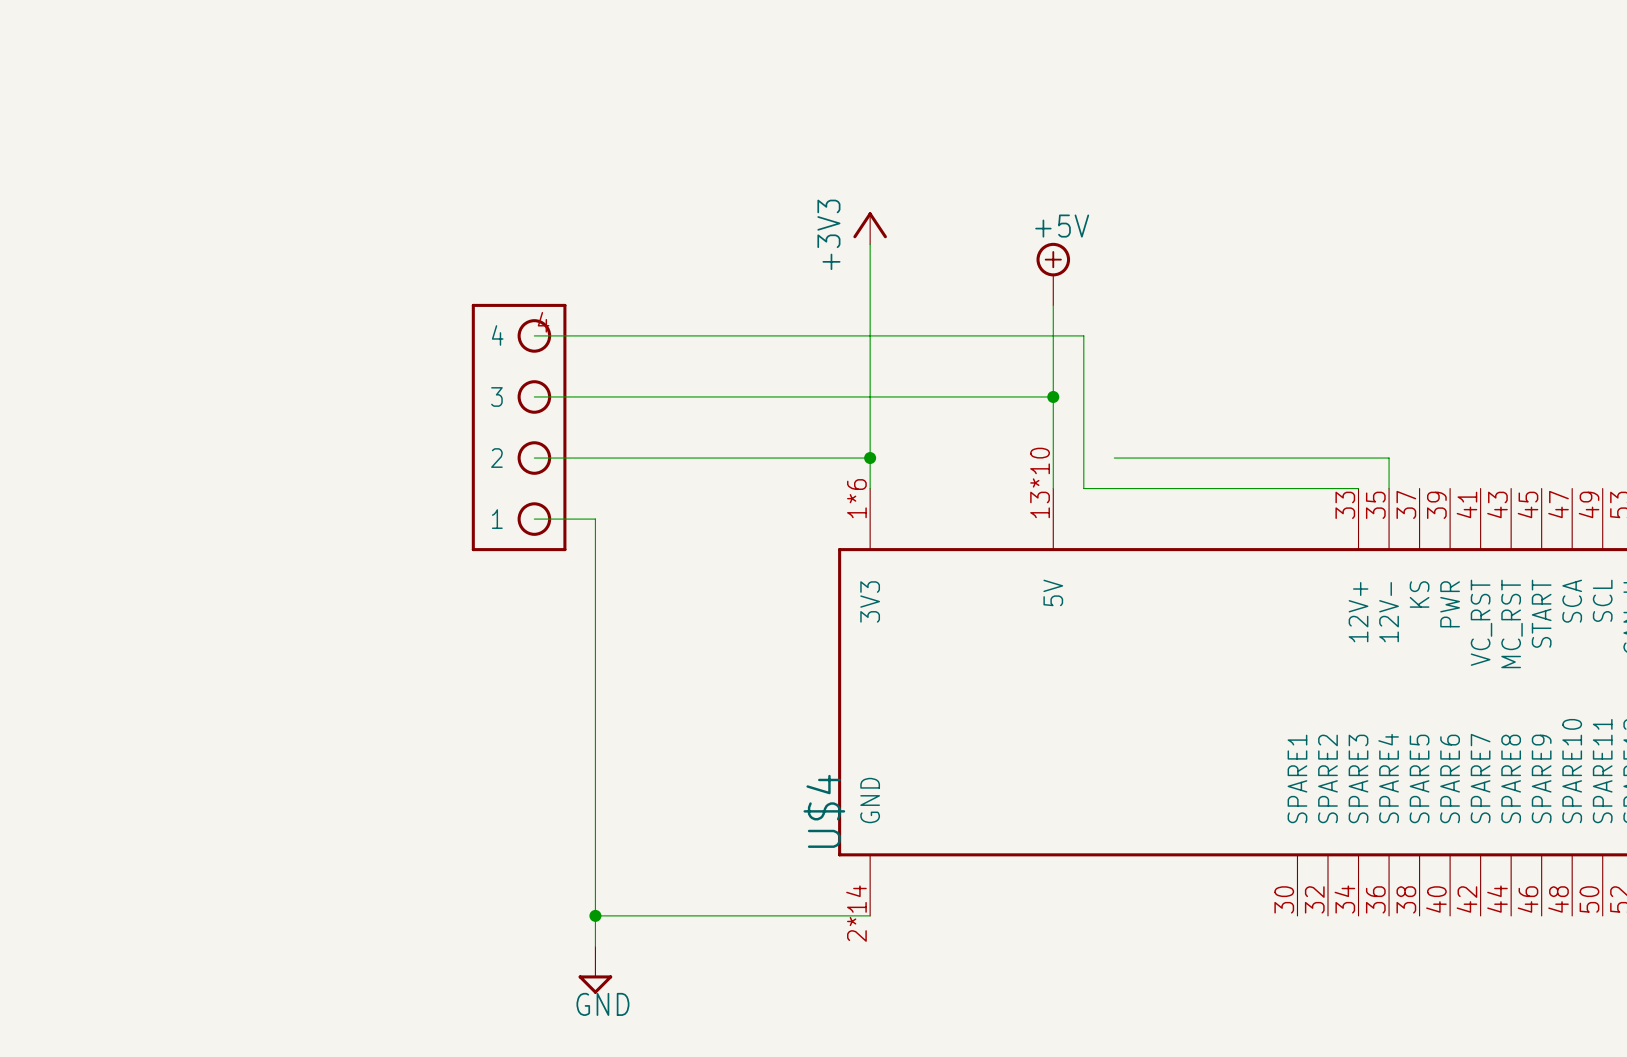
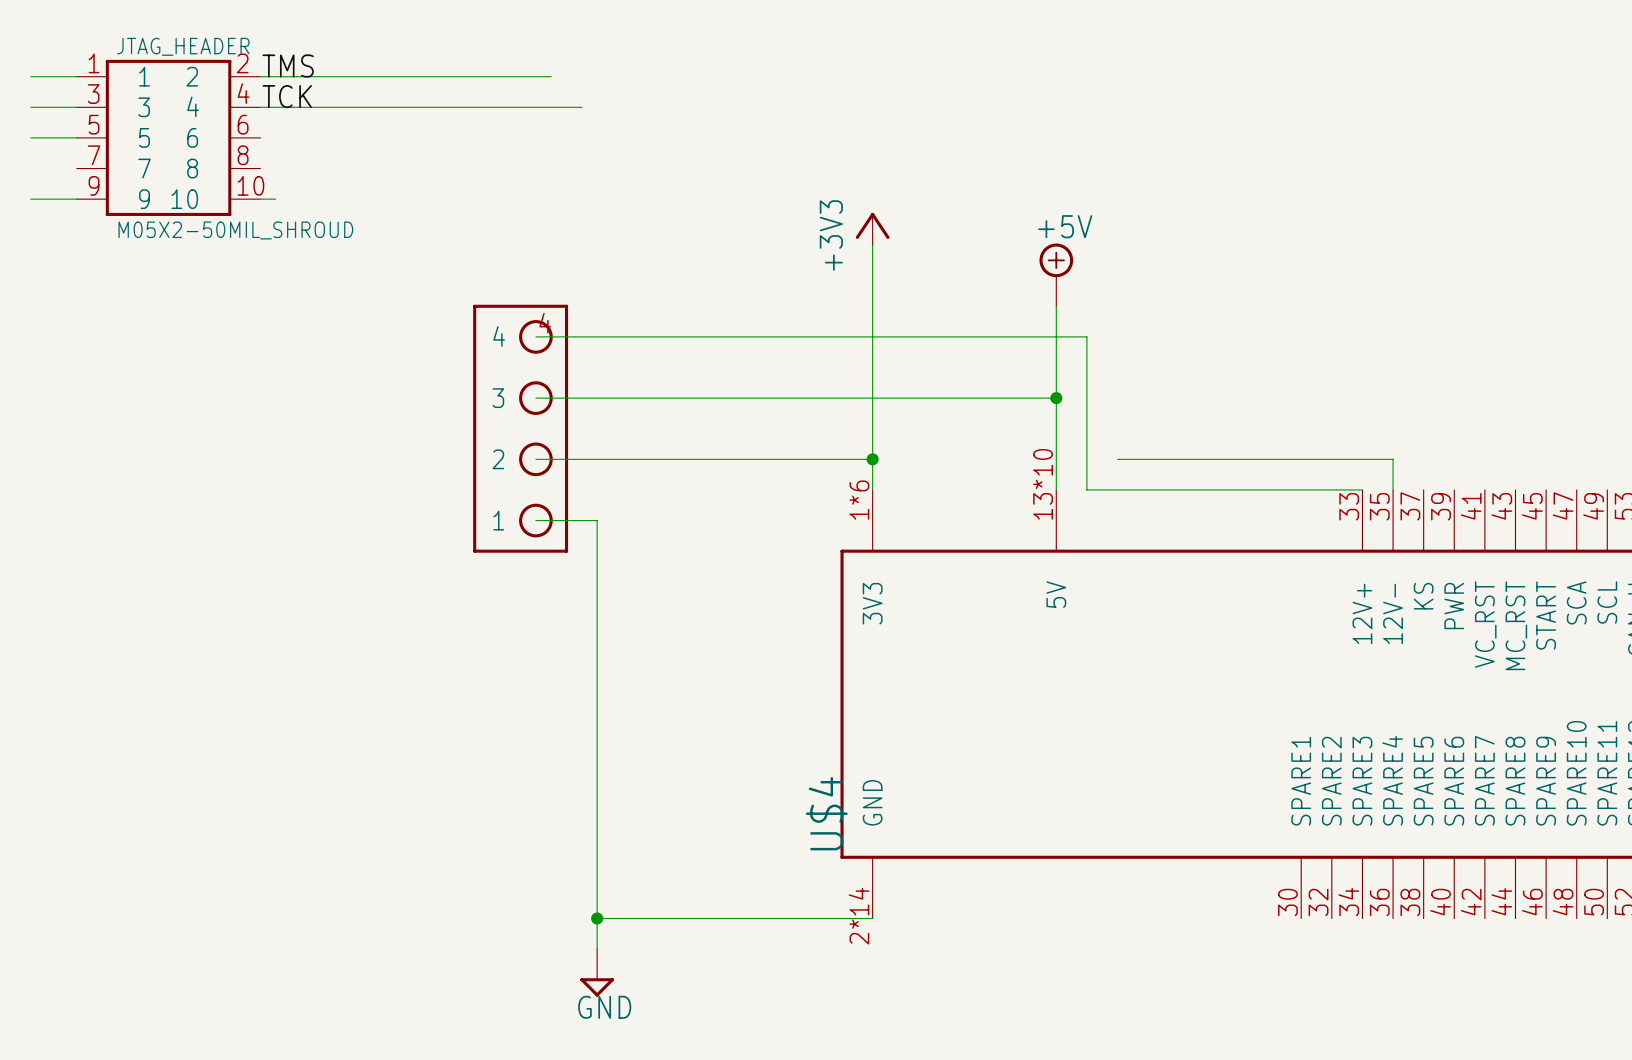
label: none -> TMS (288, 65)
wire: none -> (30, 76) (76, 76)
wire: none -> (260, 76) (551, 76)
label: none -> TCK (287, 96)
wire: none -> (30, 107) (76, 107)
wire: none -> (260, 107) (581, 107)
wire: none -> (30, 137) (76, 137)
JTAG_HEADER: none -> M05X2-50MIL_SHROUD (168, 137)
wire: none -> (30, 199) (76, 199)
wire: none -> (260, 199) (275, 199)

